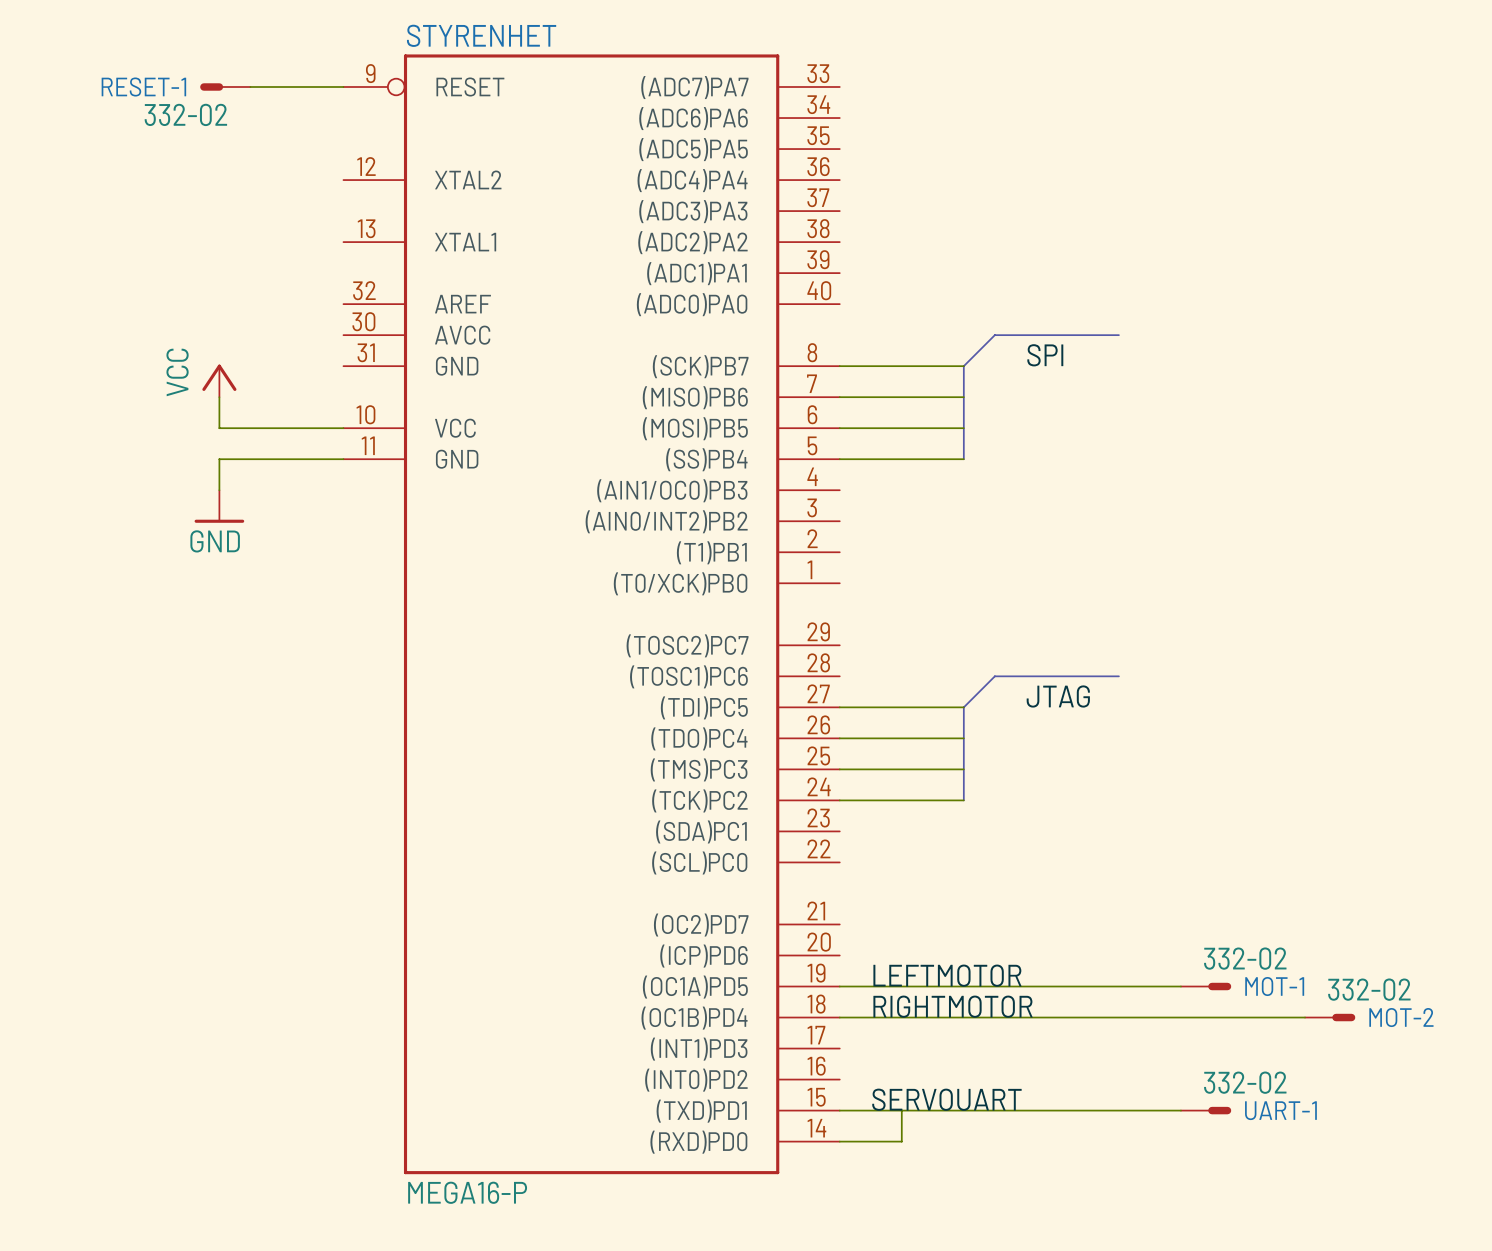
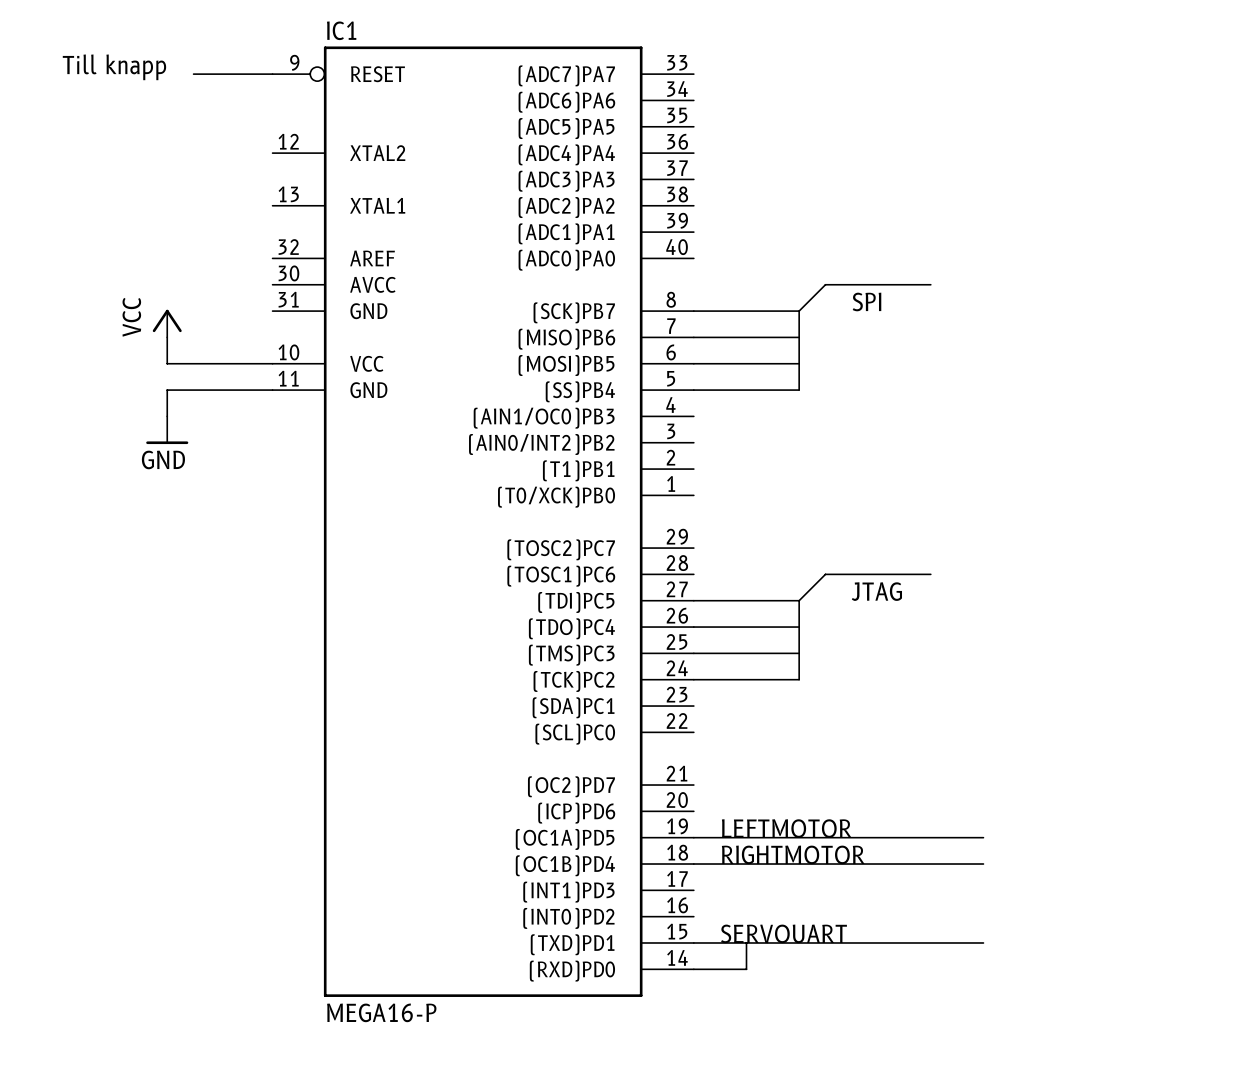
STYRENHET name: STYRENHET (481, 35) -> IC1 (341, 30)
text: none -> Till knapp (114, 67)
RESET-1: 332-02 (225, 87) -> none
MOT-1: 332-02 (1206, 986) -> none
wire: (1180, 1017) (1305, 1017) -> none
MOT-2: 332-02 (1330, 1017) -> none
UART-1: 332-02 (1206, 1110) -> none

